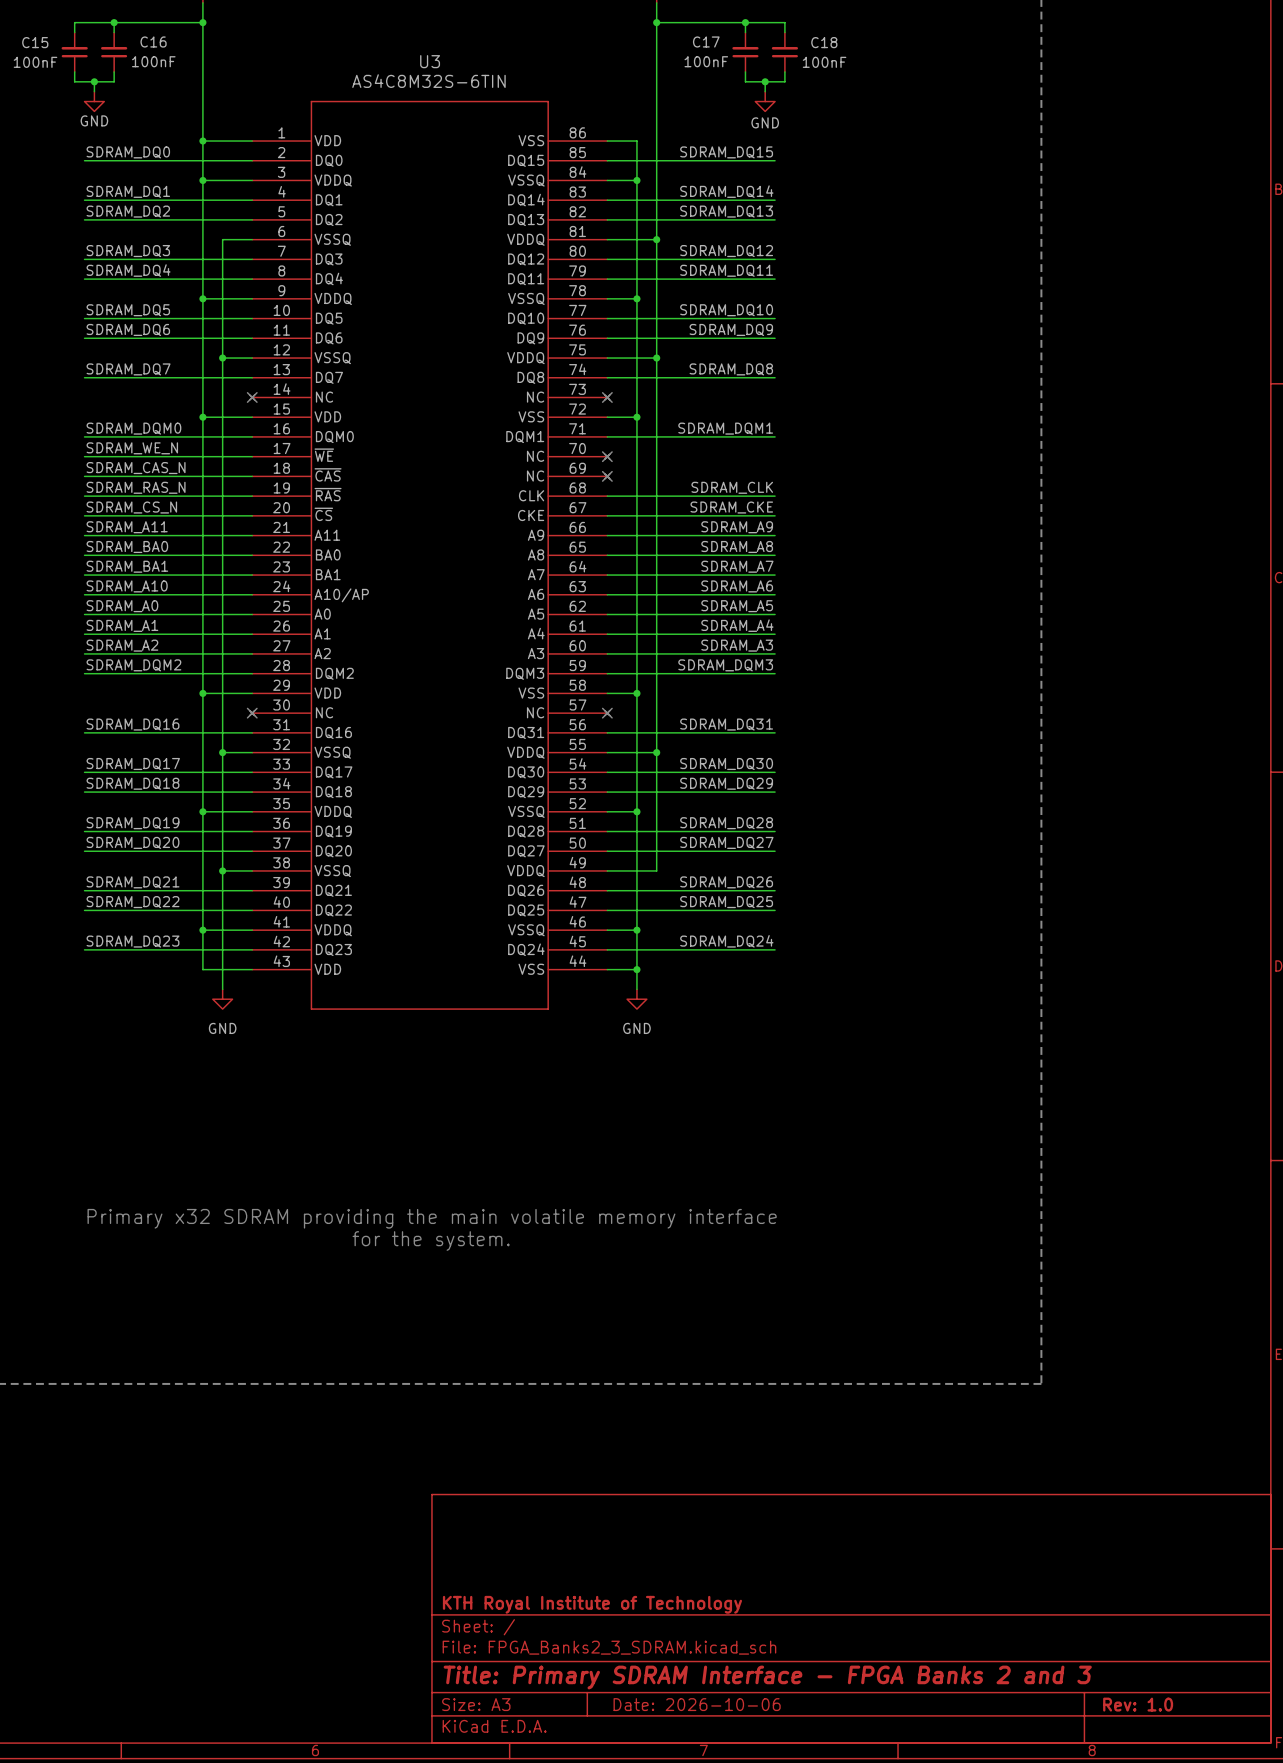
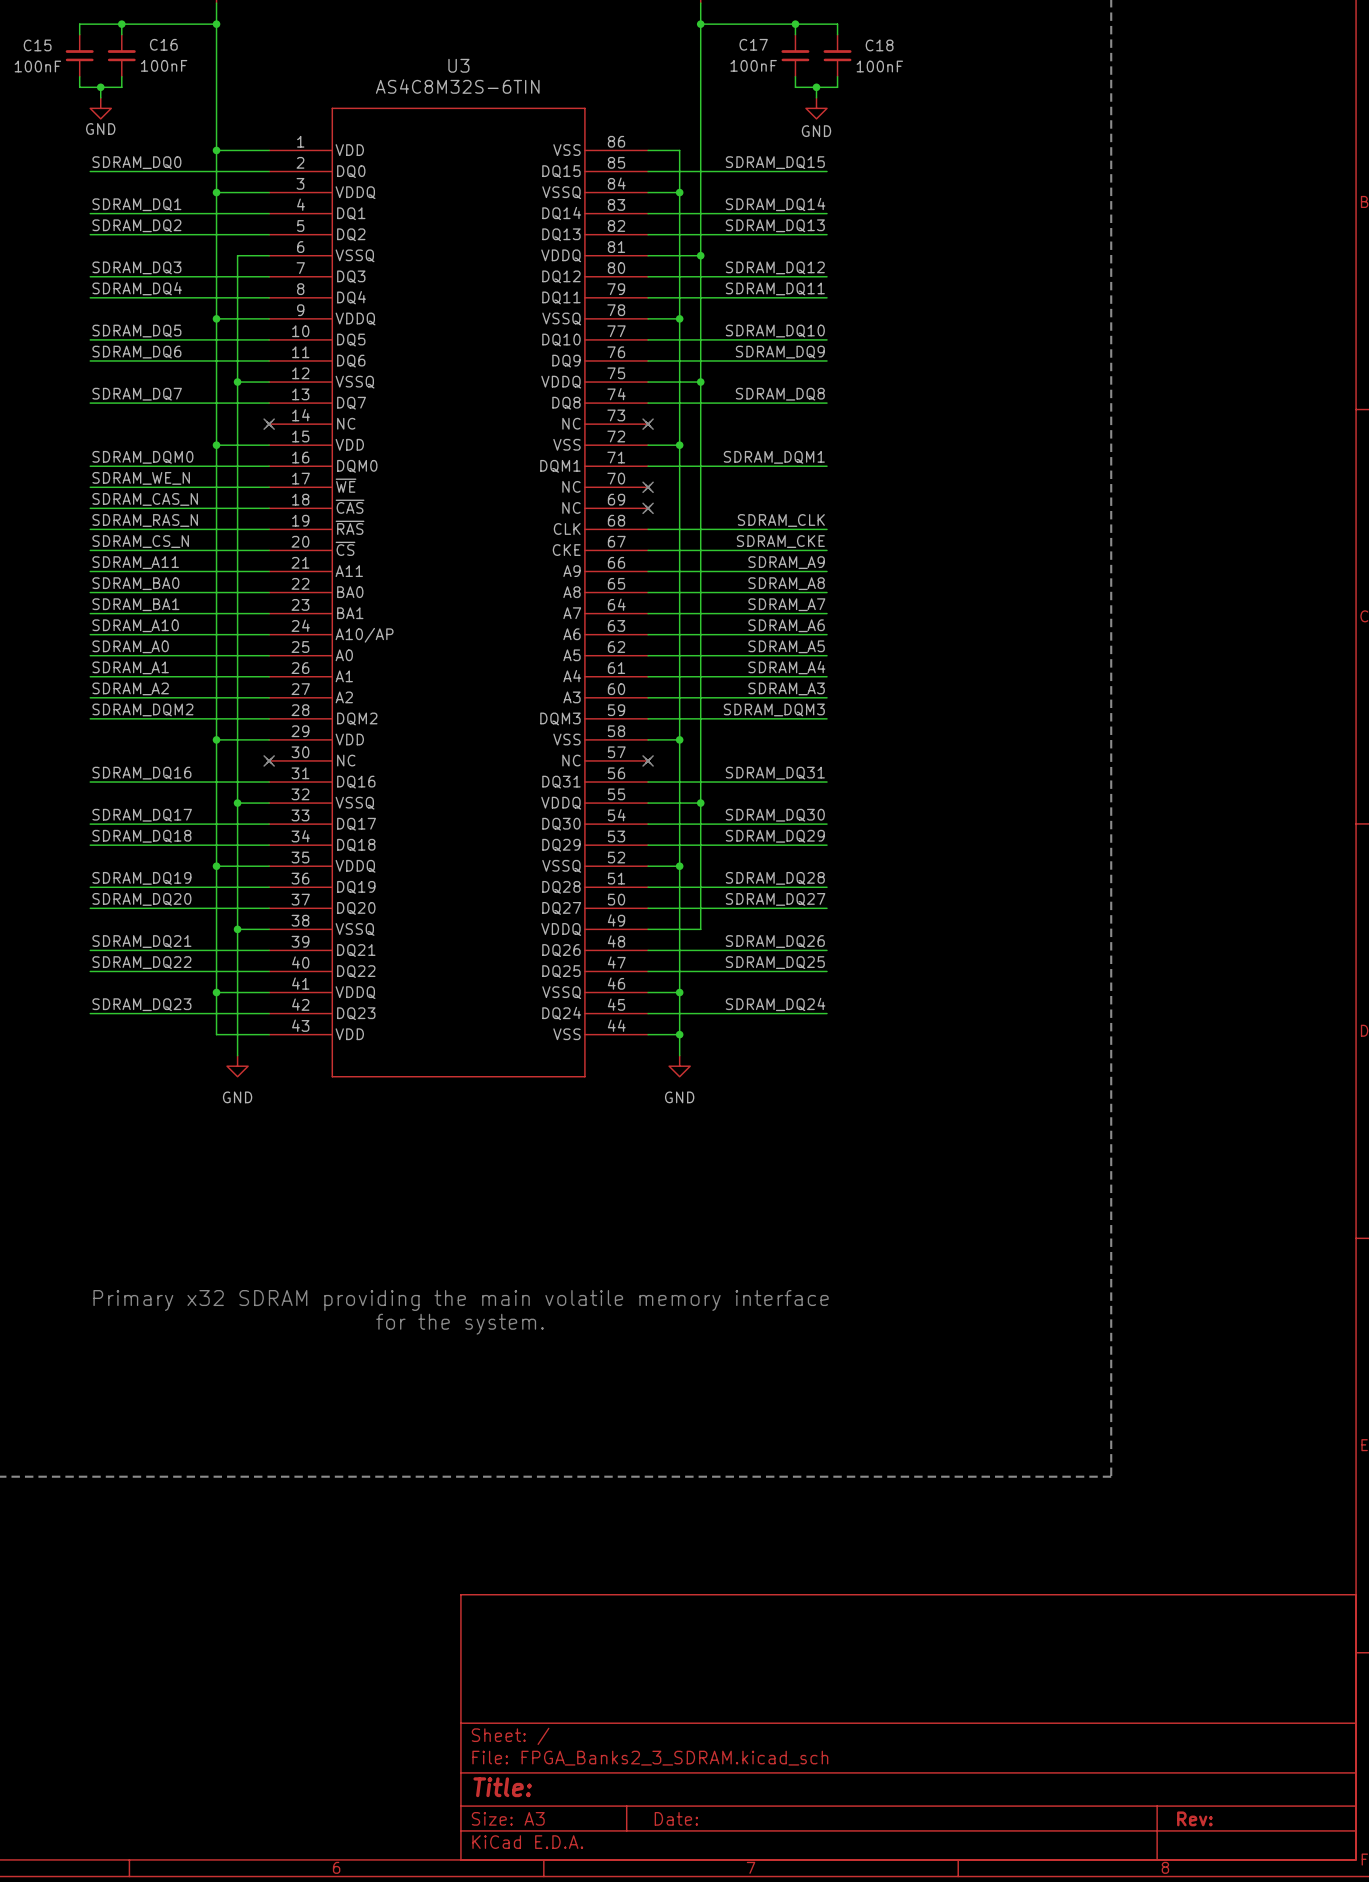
title block: KTH Royal Institute of Technology (592, 1604) -> none
title block: Title: Primary SDRAM Interface - FPGA Banks 2 and 3 (767, 1677) -> Title: (502, 1787)
title block: Date: 2026-10-06 (697, 1704) -> Date: (676, 1818)
title block: Rev: 1.0 (1138, 1704) -> Rev: (1194, 1818)

